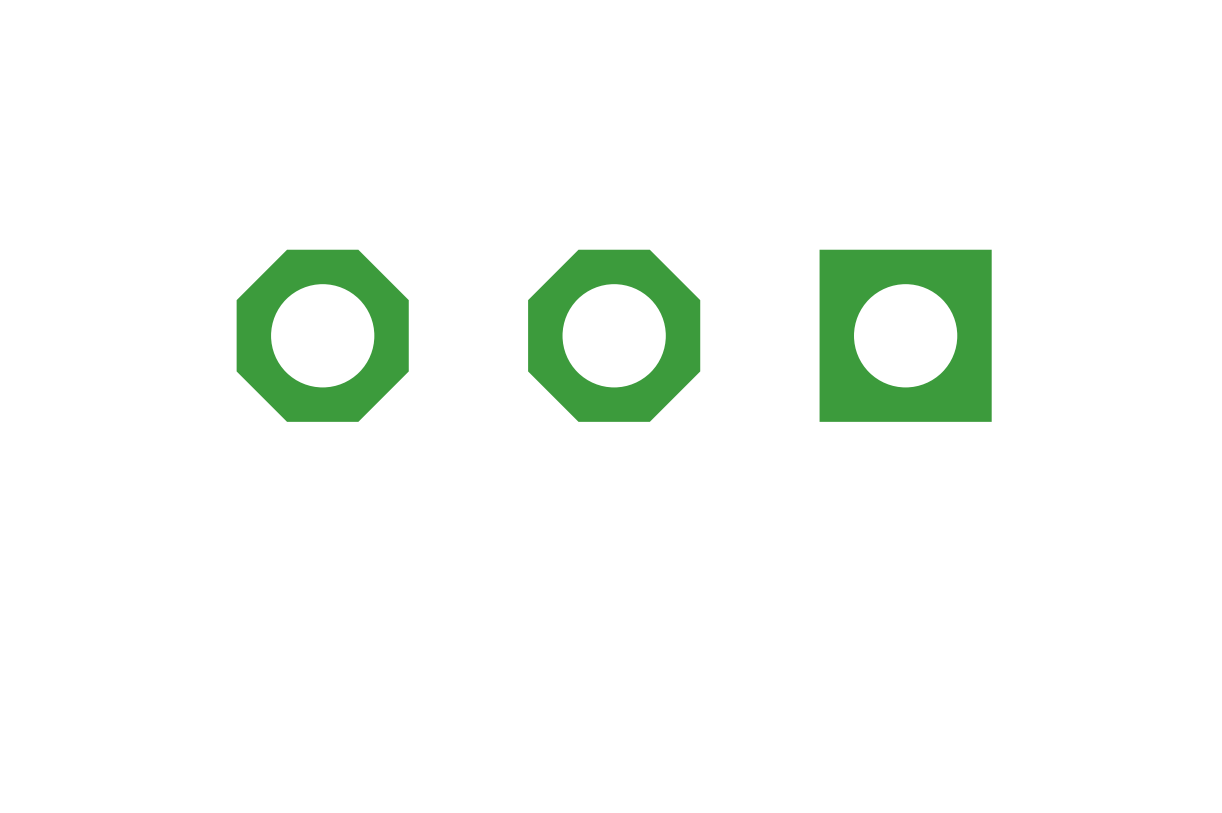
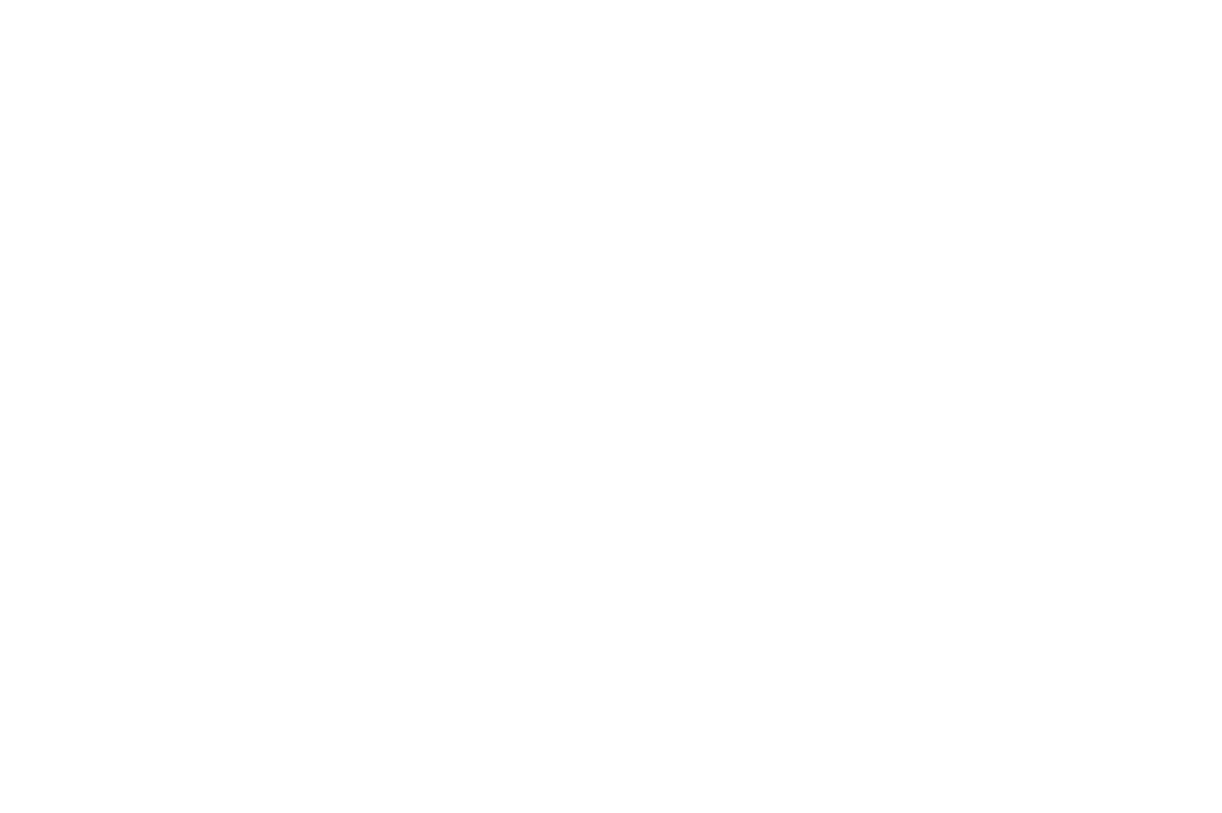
part: (614, 335) -> none

